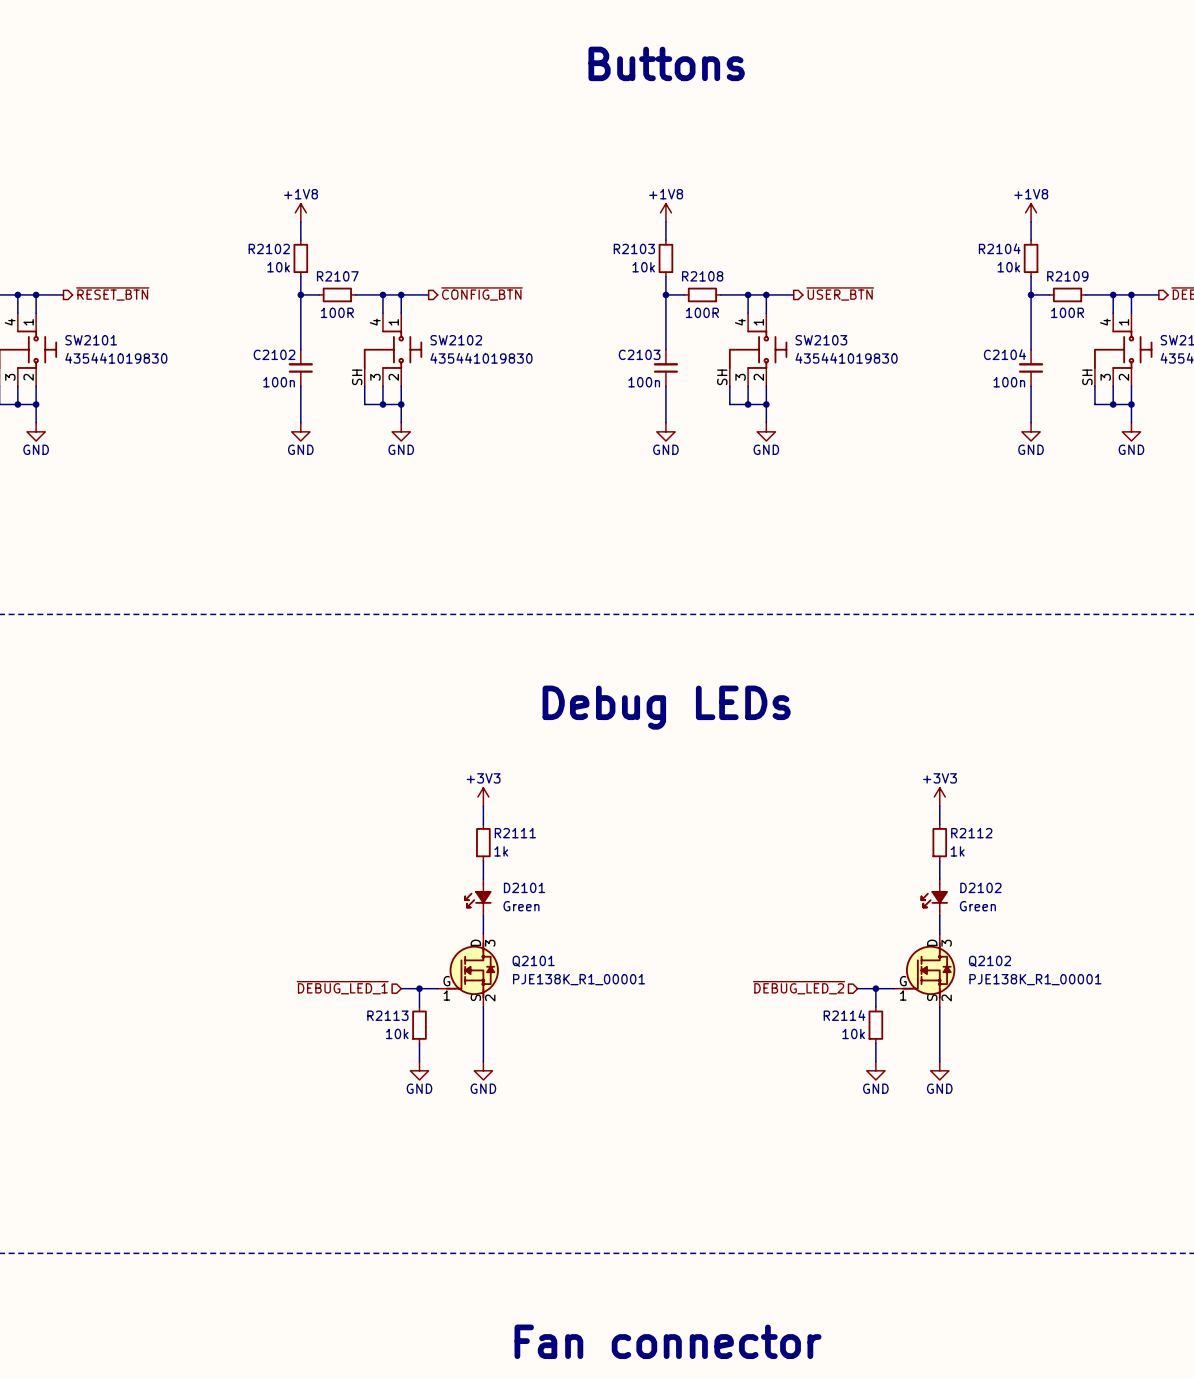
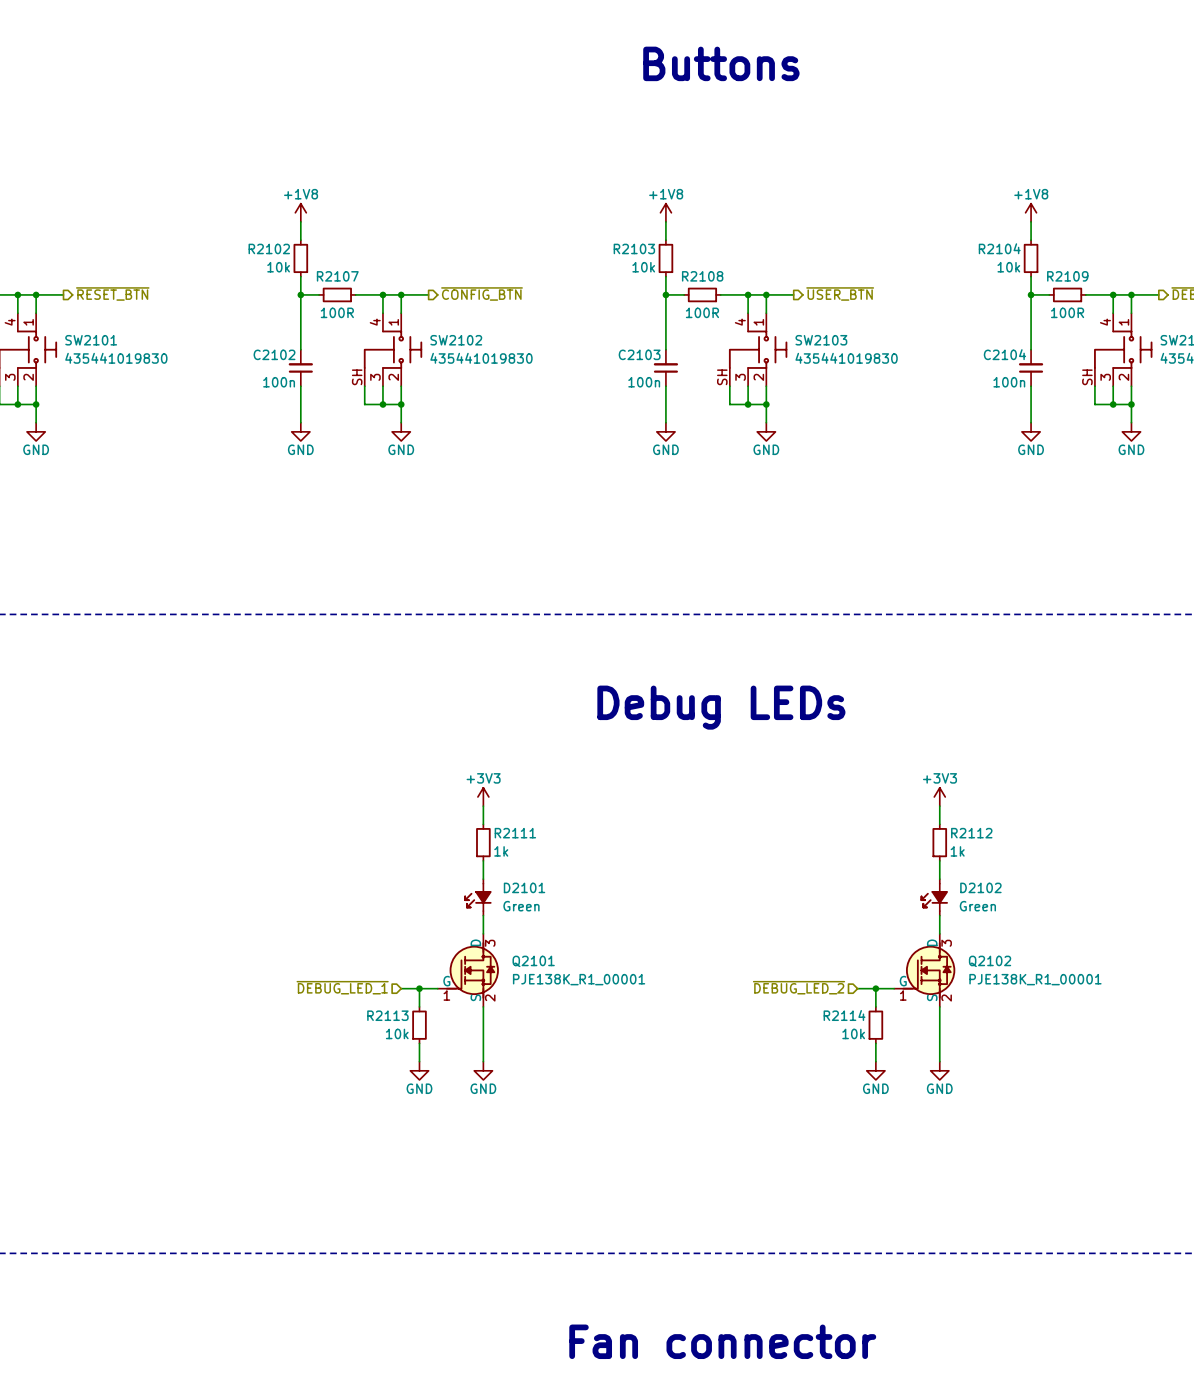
text position: Buttons (666, 63) -> Buttons (721, 63)
text position: Debug LEDs (666, 707) -> Debug LEDs (721, 707)
text position: Fan connector (667, 1341) -> Fan connector (722, 1341)

